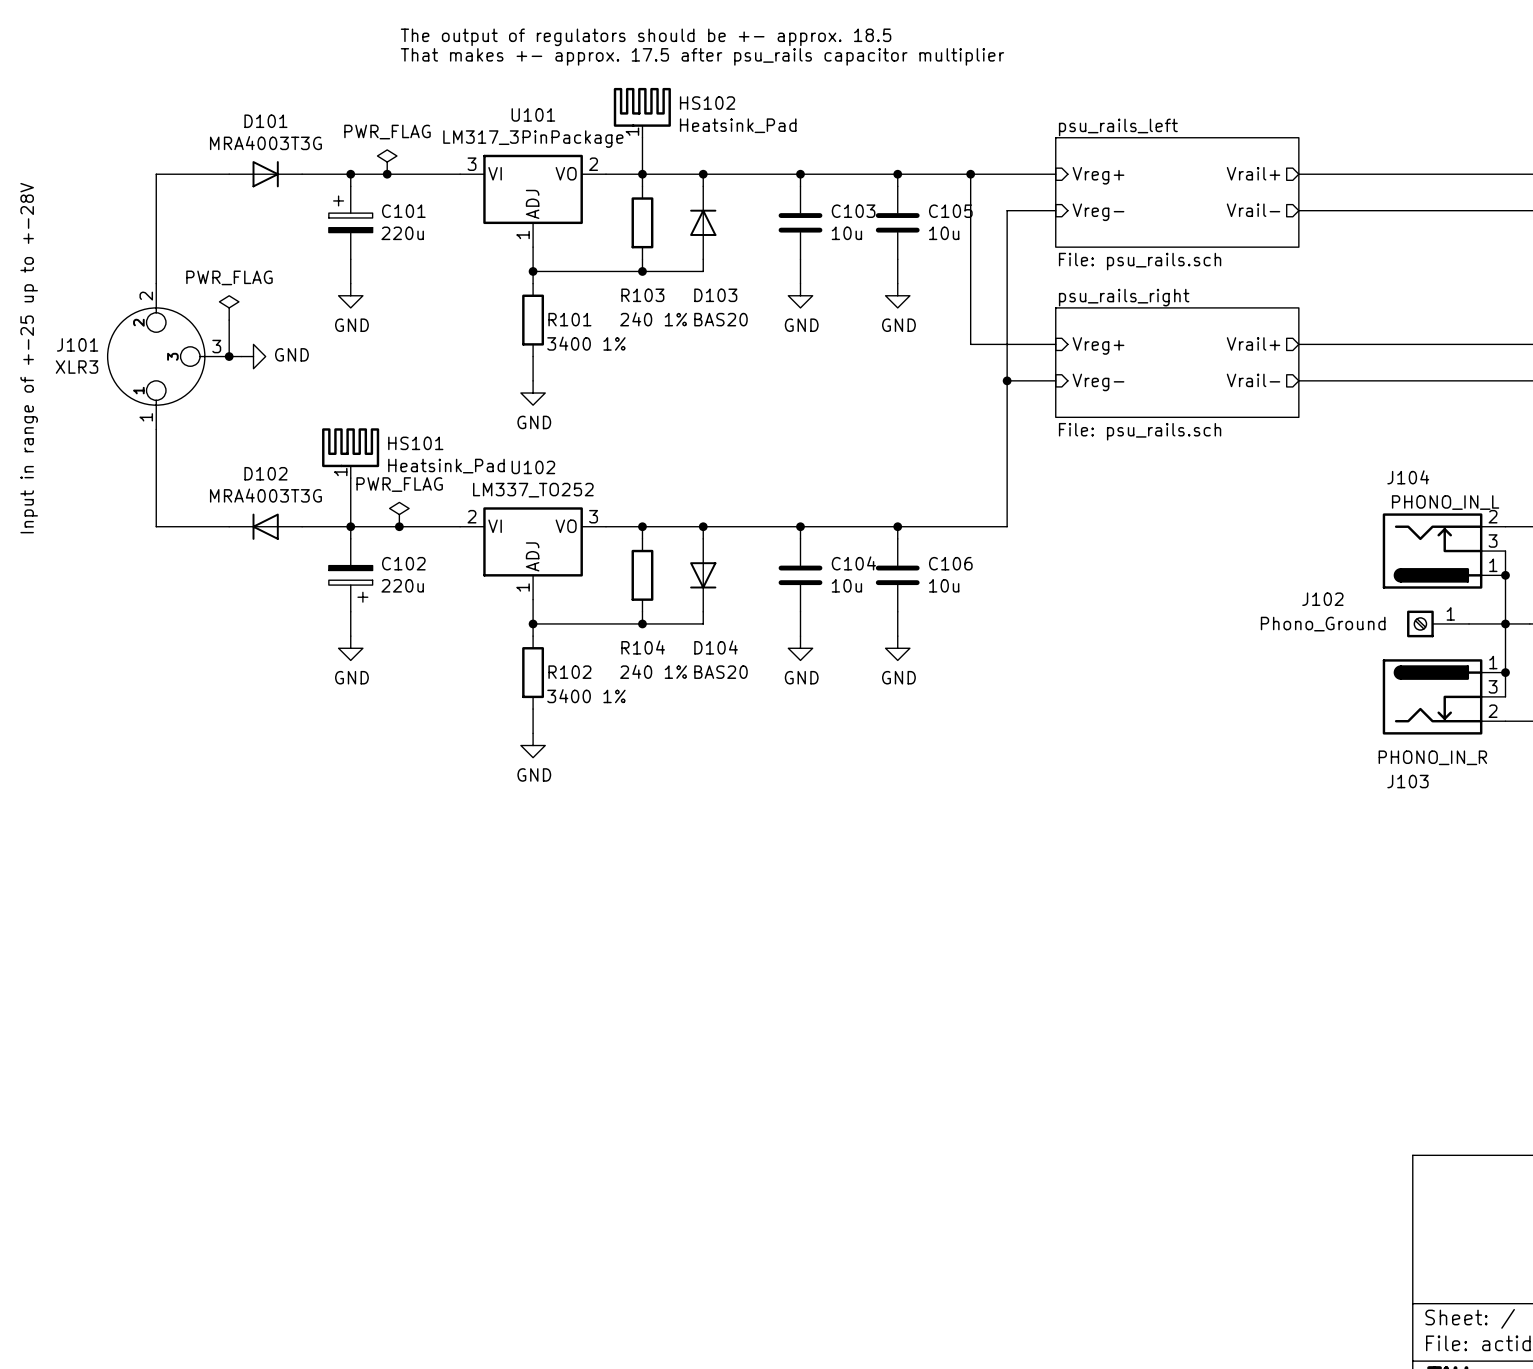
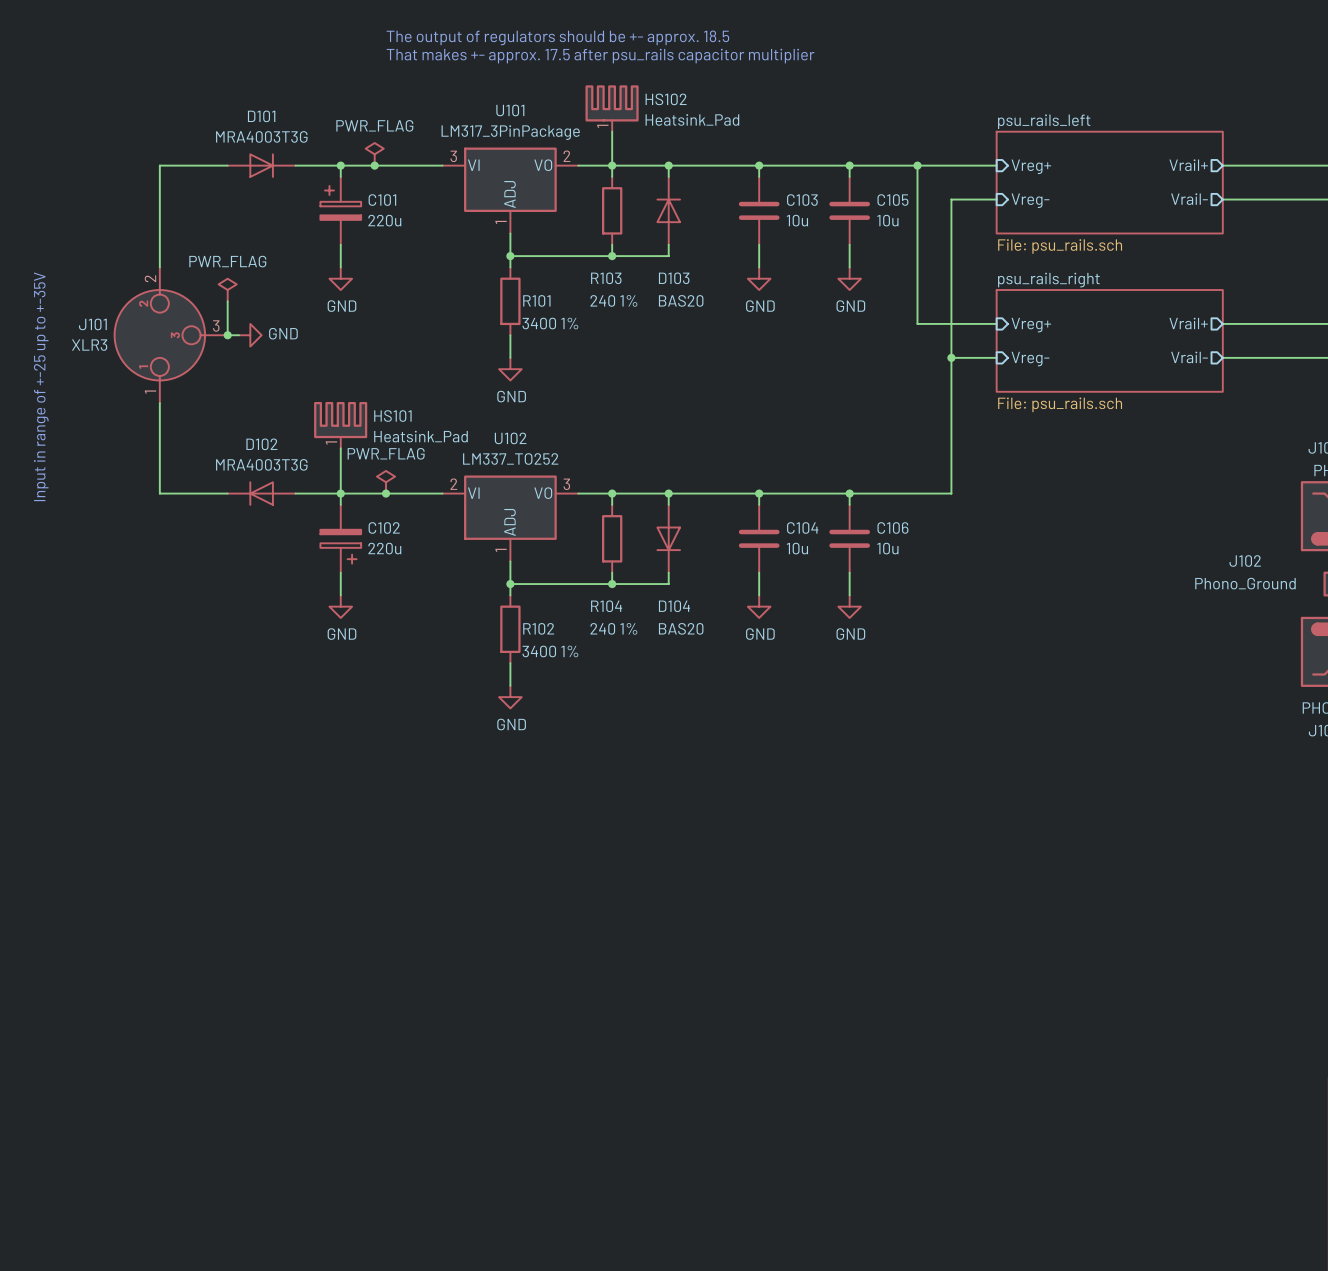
text: Input in range of +-25 up to +-28V (29, 358) -> Input in range of +-25 up to +-35V (41, 386)

